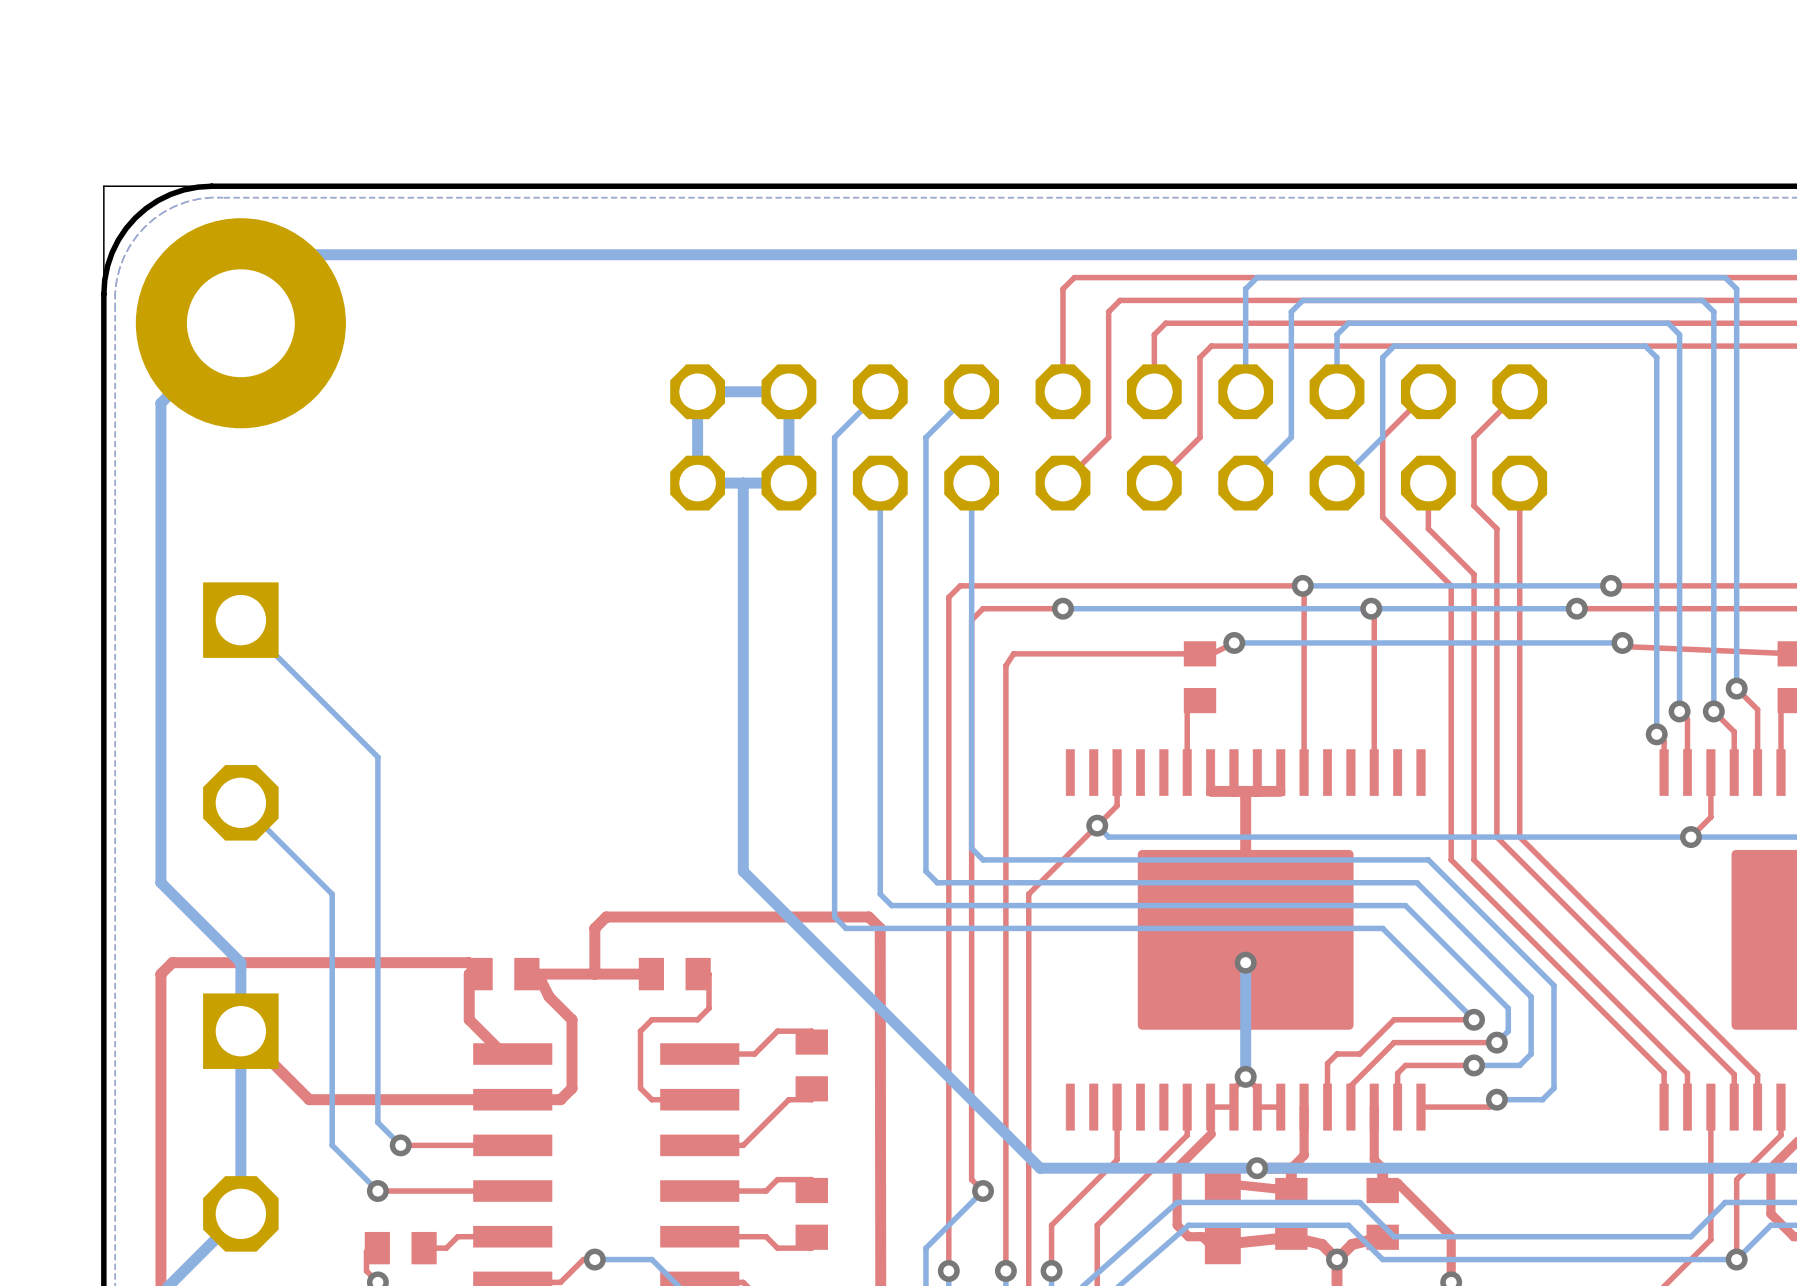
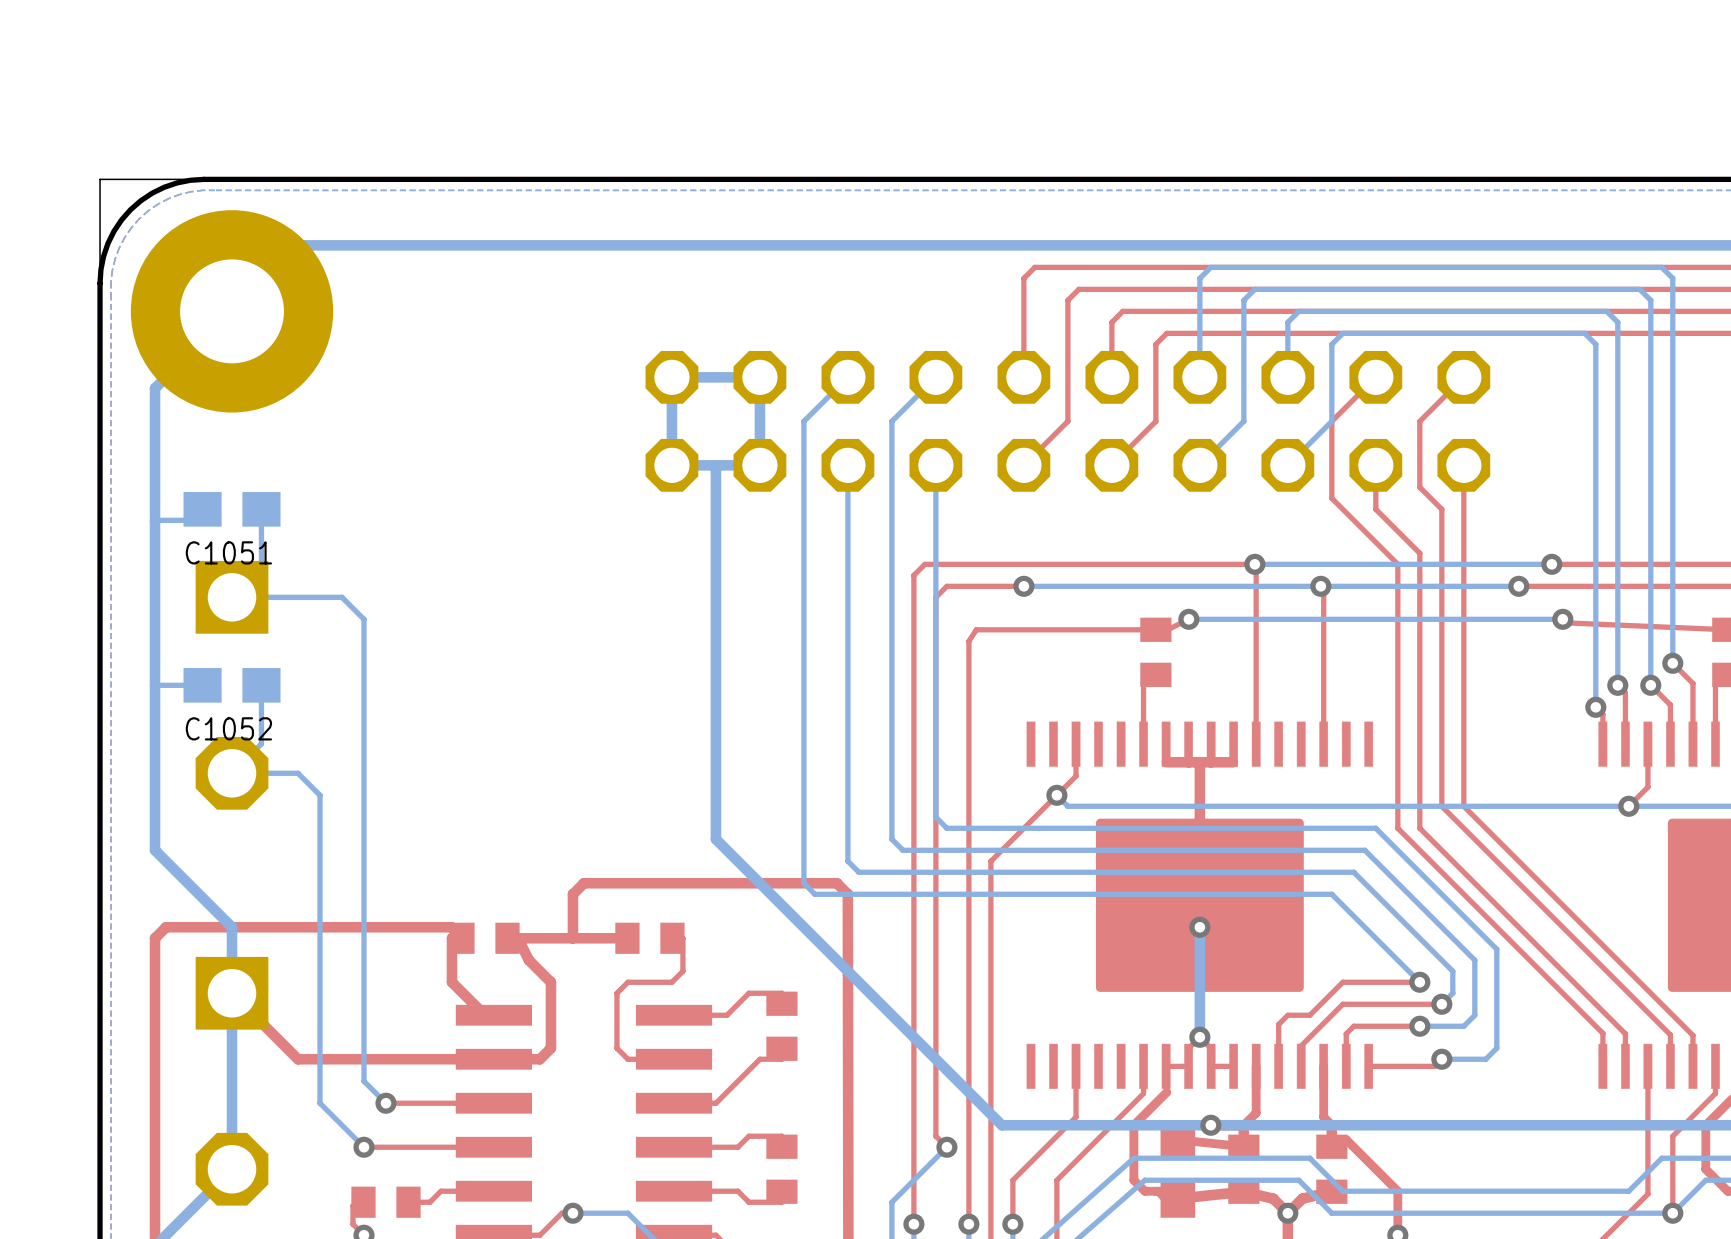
bottom track: none -> (202, 509) (191, 520) (155, 520)
C1051: none -> (232, 509)
bottom track: (240, 620) (377, 757) -> (261, 509) (261, 567) (232, 597) (341, 597) (363, 619) (363, 729)
bottom track: none -> (202, 685) (155, 685)
C1052: none -> (232, 685)
bottom track: (240, 802) (332, 894) -> (261, 685) (261, 743) (232, 773) (298, 773) (319, 795) (319, 861)

